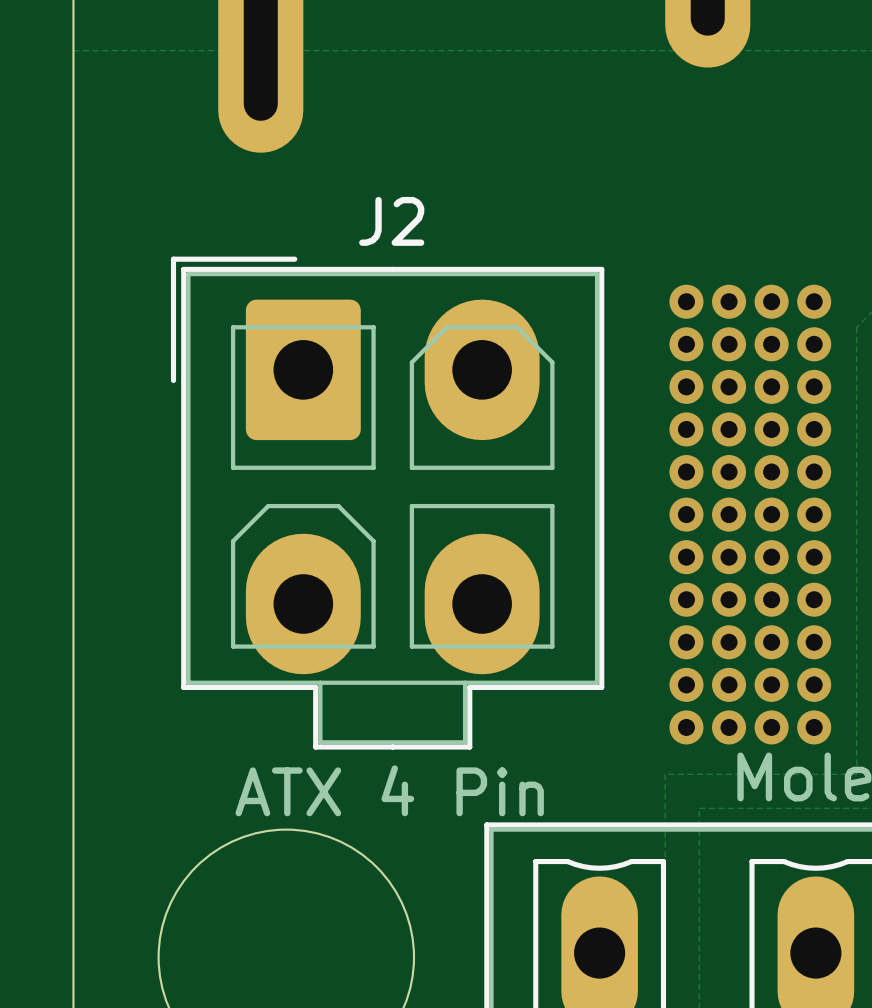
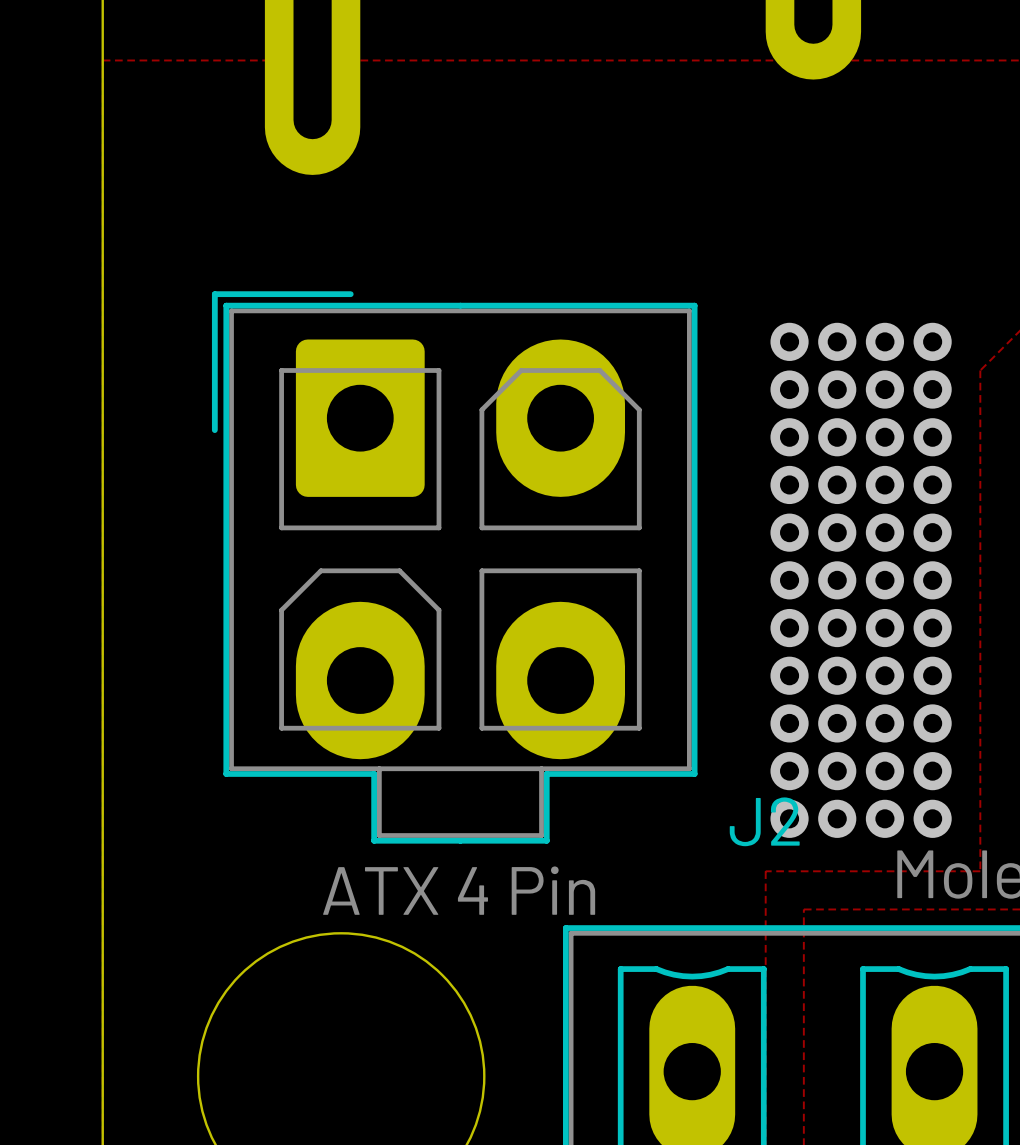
J2 name position: J2 (391, 221) -> J2 (764, 821)

